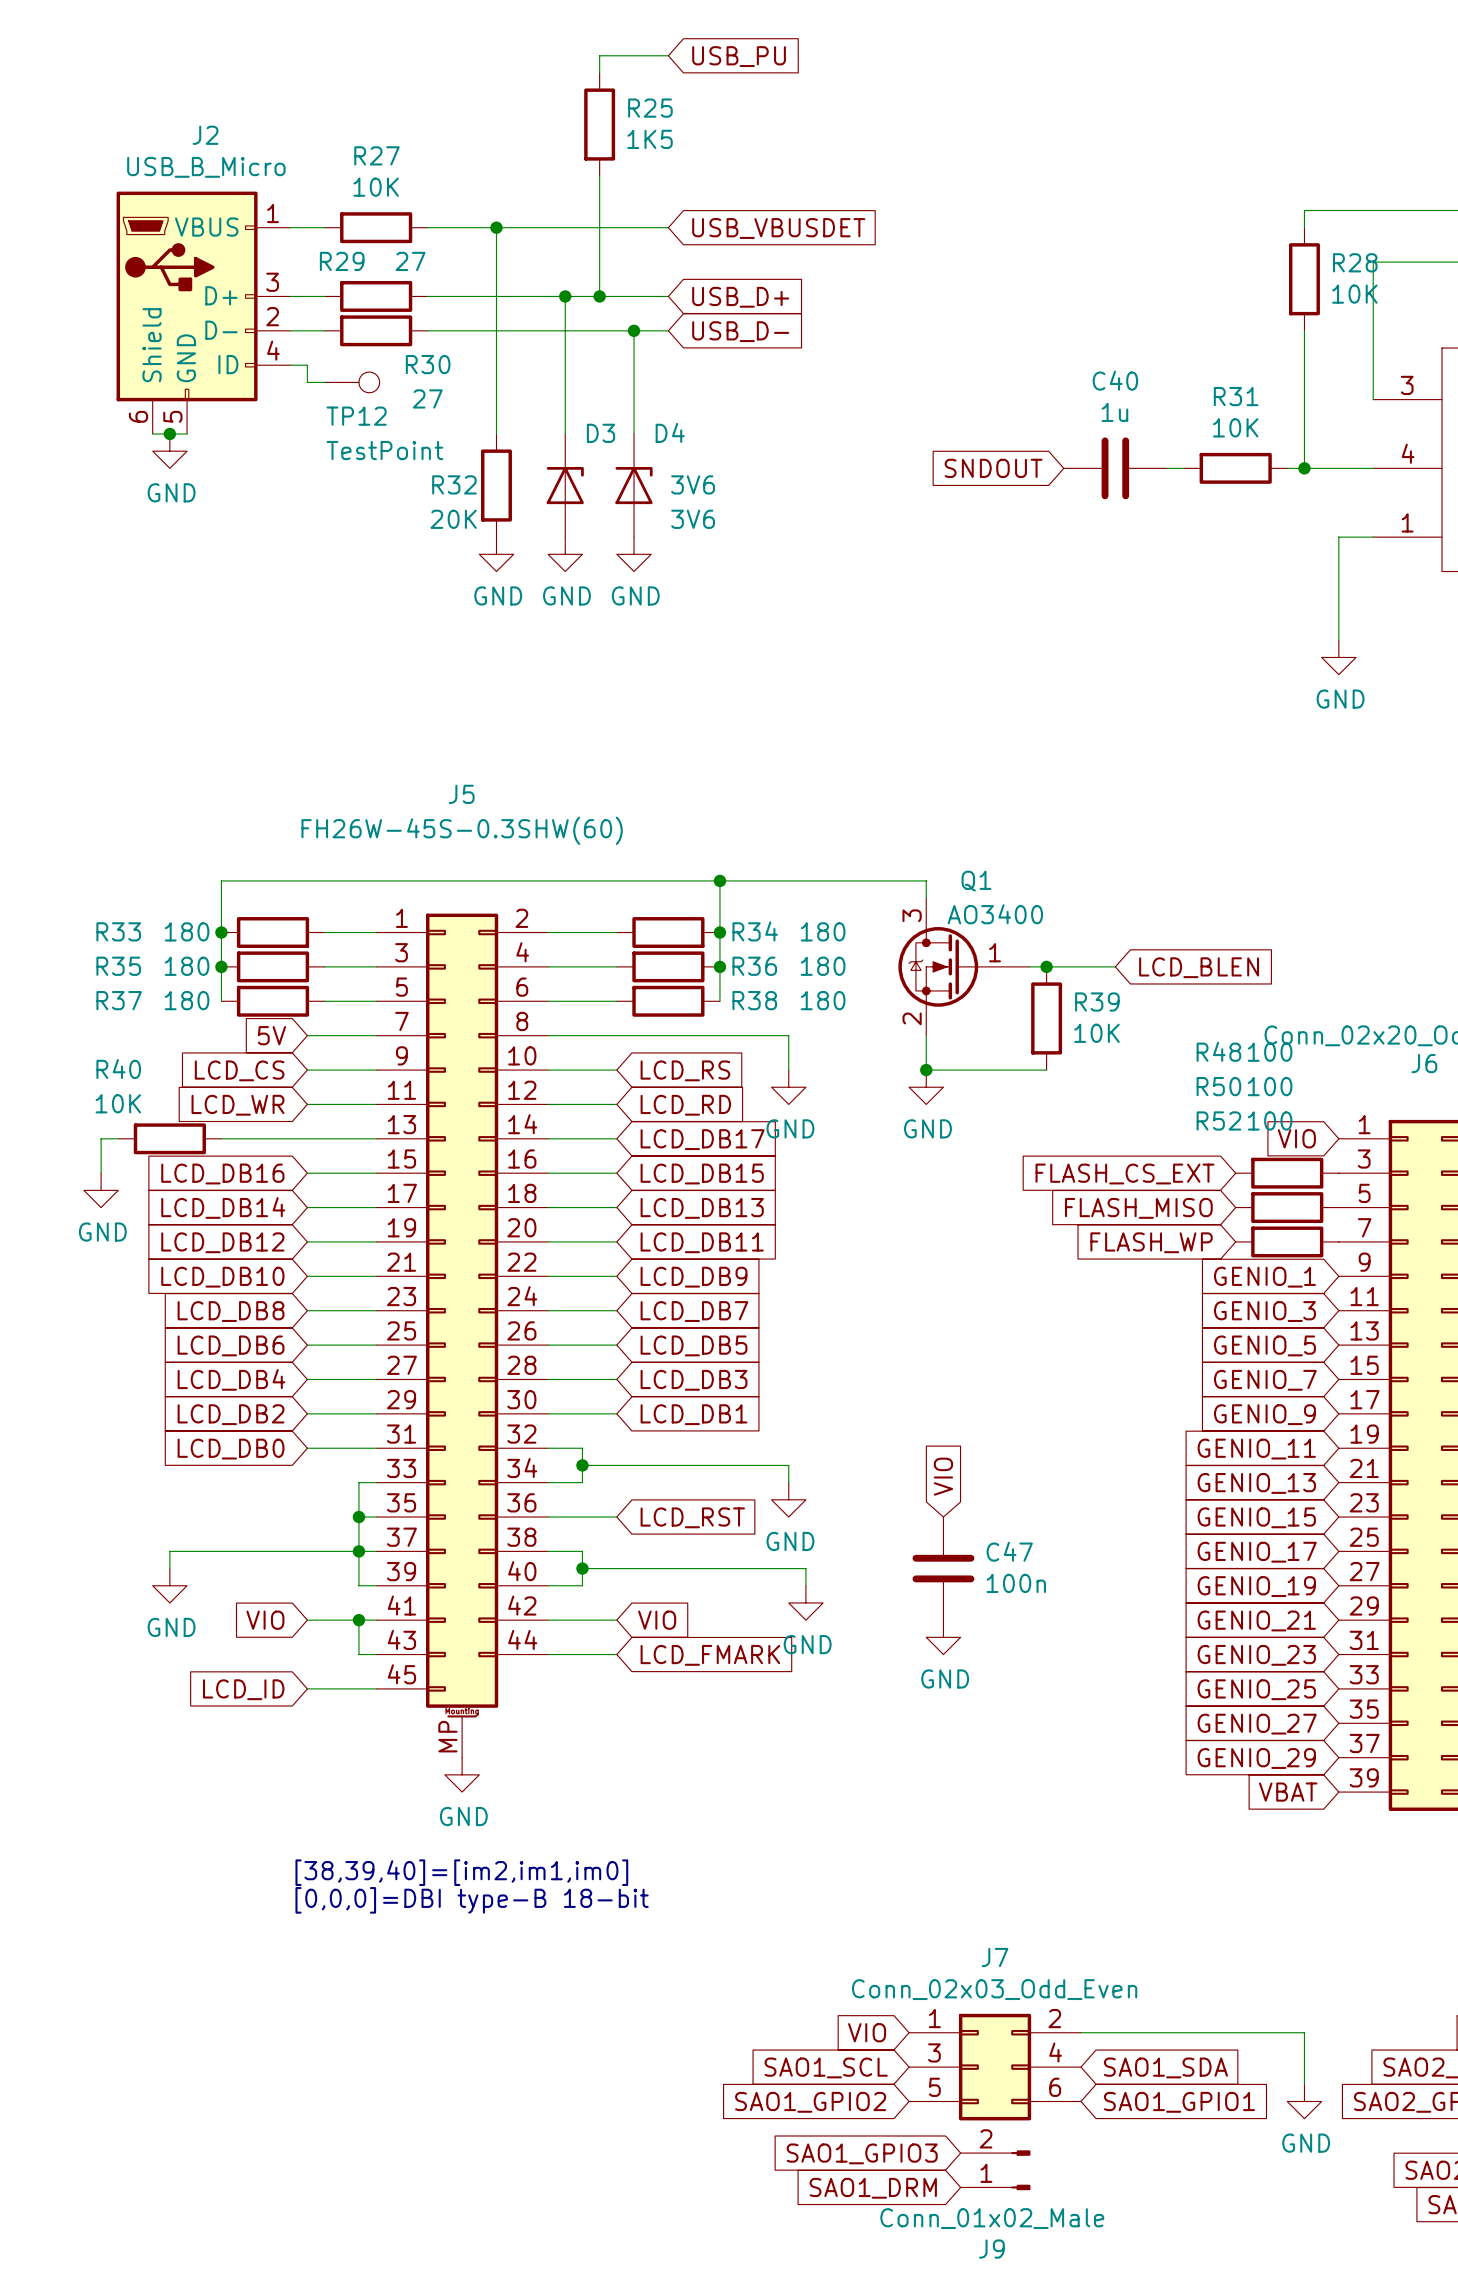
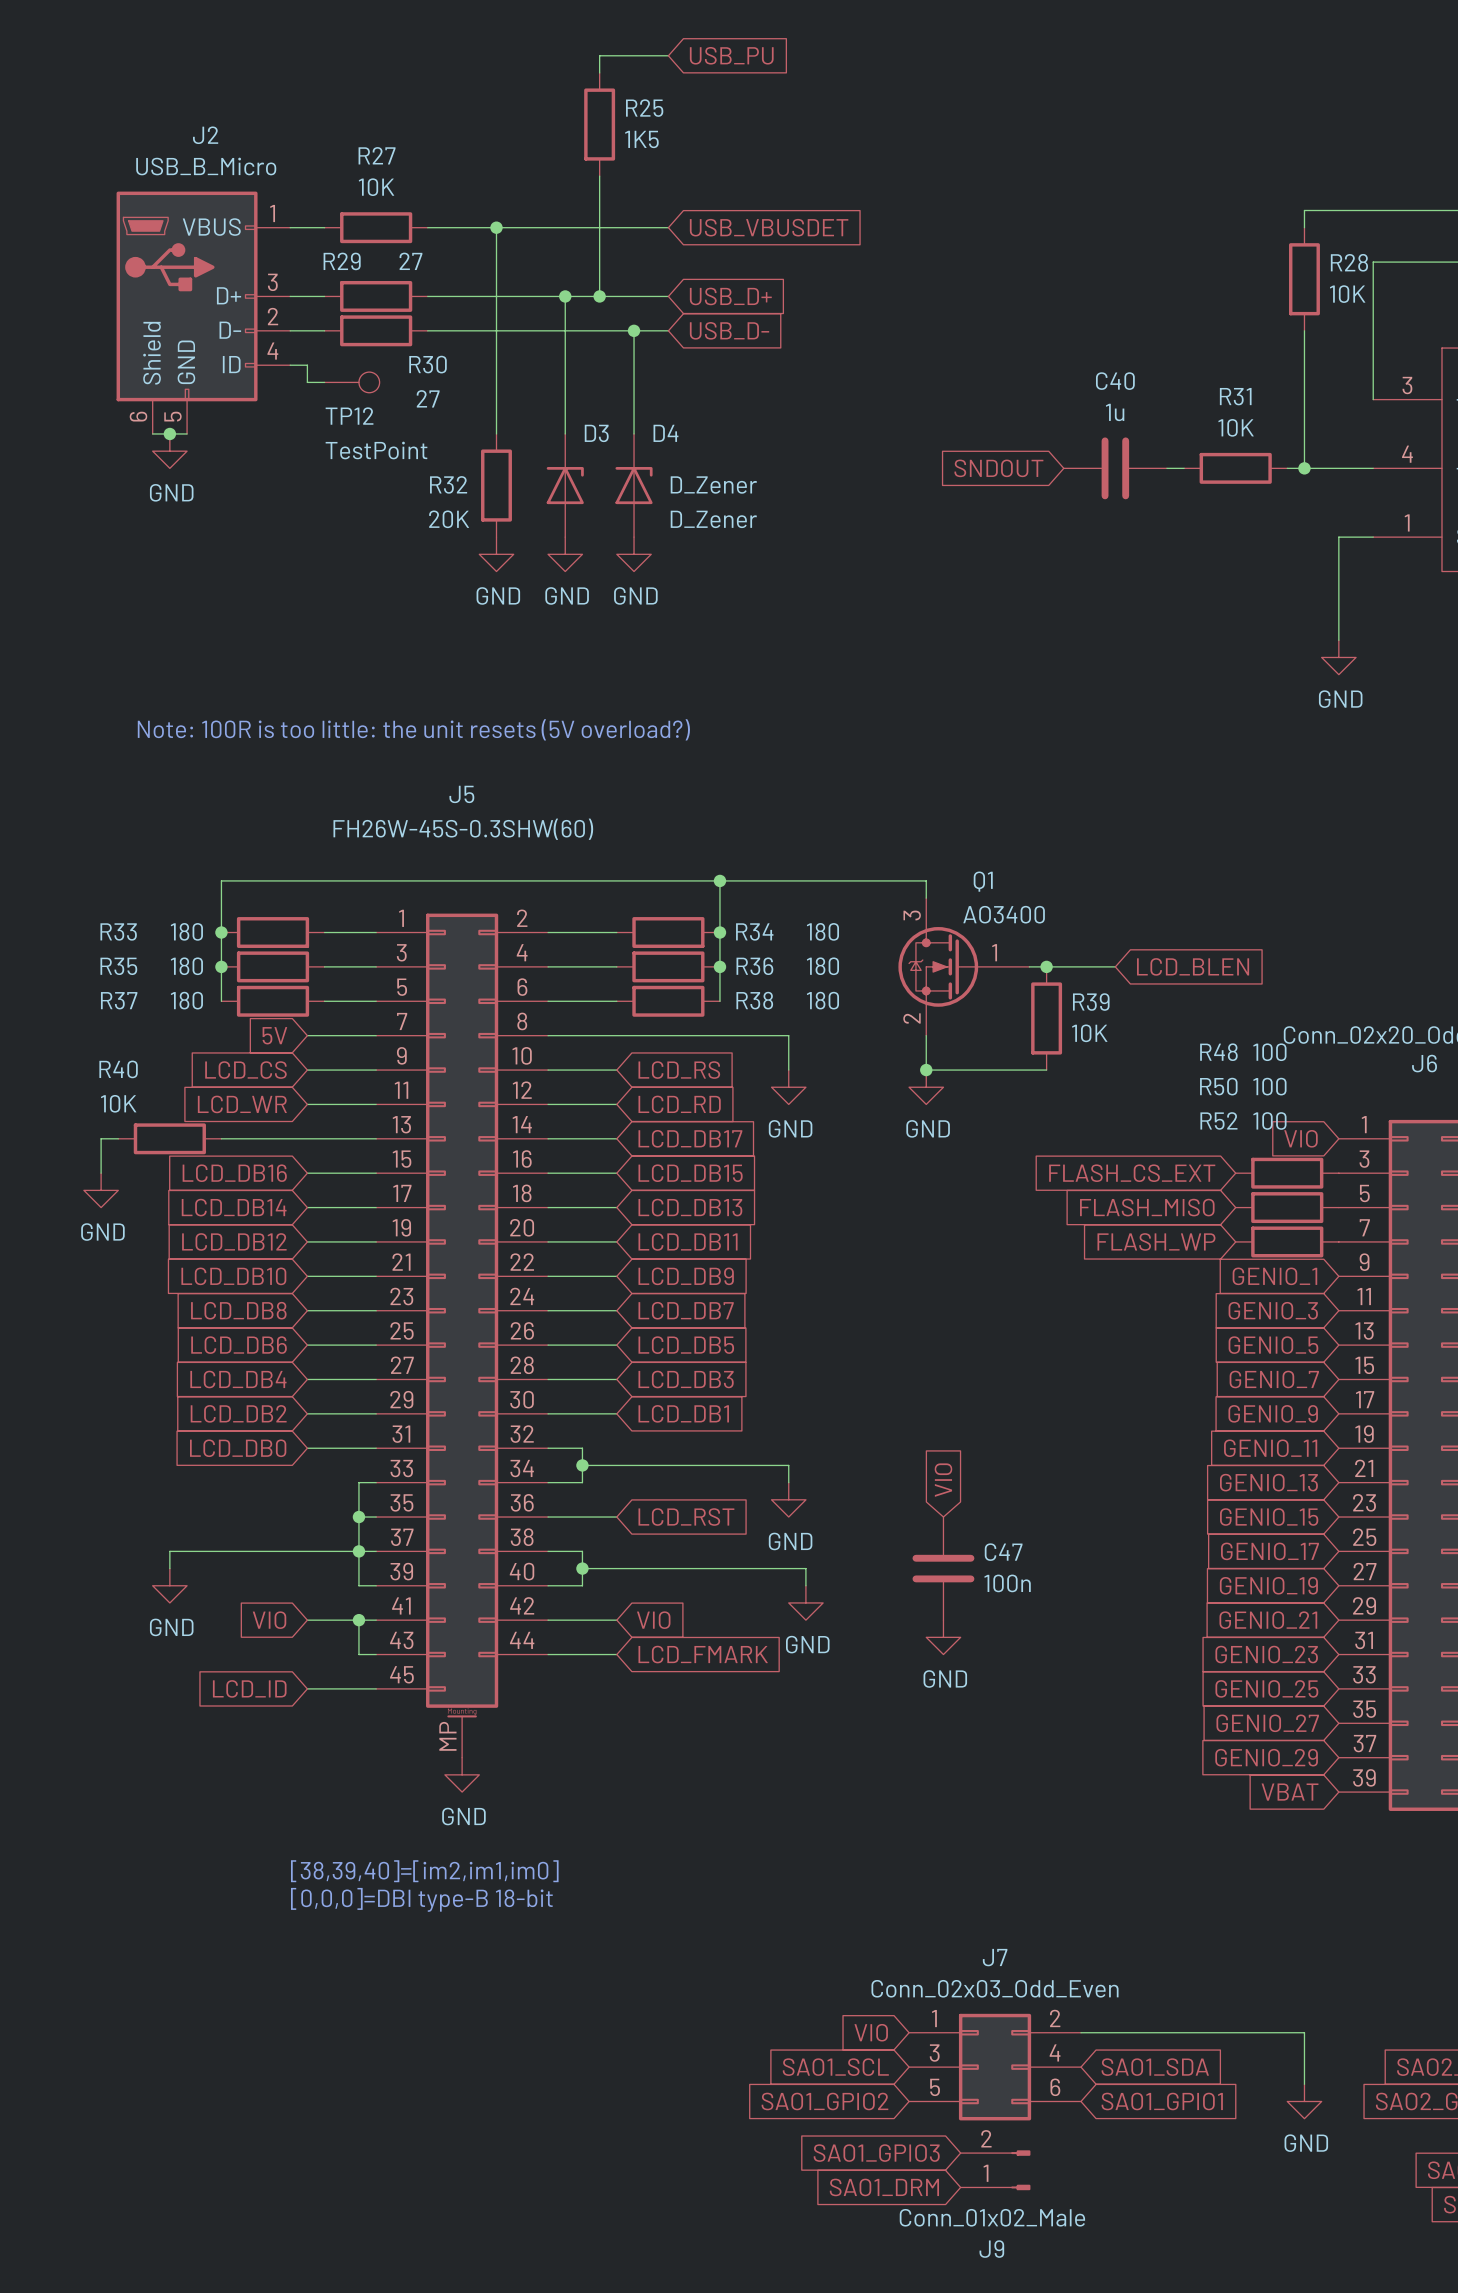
D3 value: 3V6 (693, 484) -> D_Zener (713, 485)
D4 value: 3V6 (693, 519) -> D_Zener (713, 519)
text: none -> Note: 100R is too little: the unit resets (5V overload?) (413, 729)

